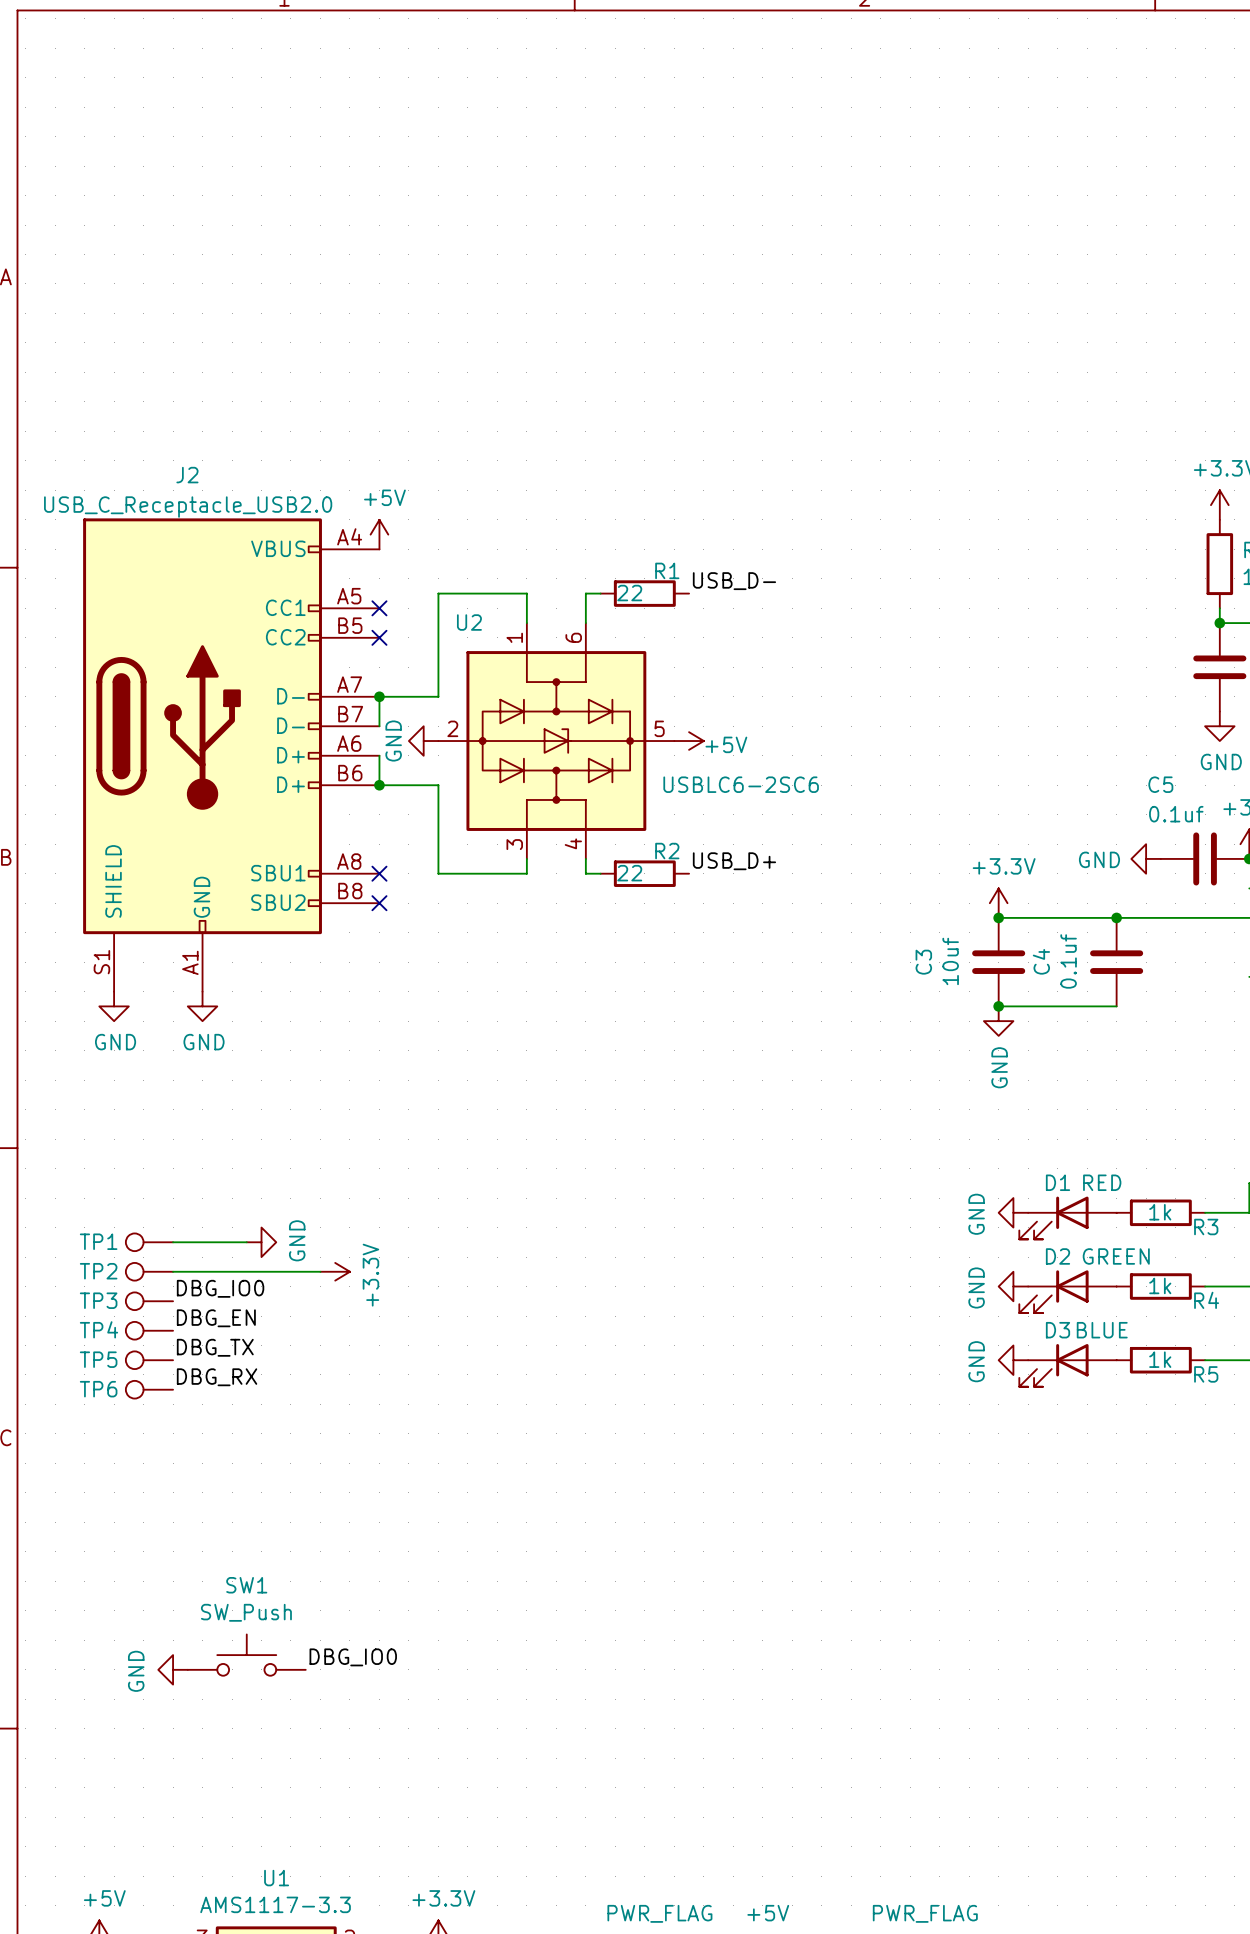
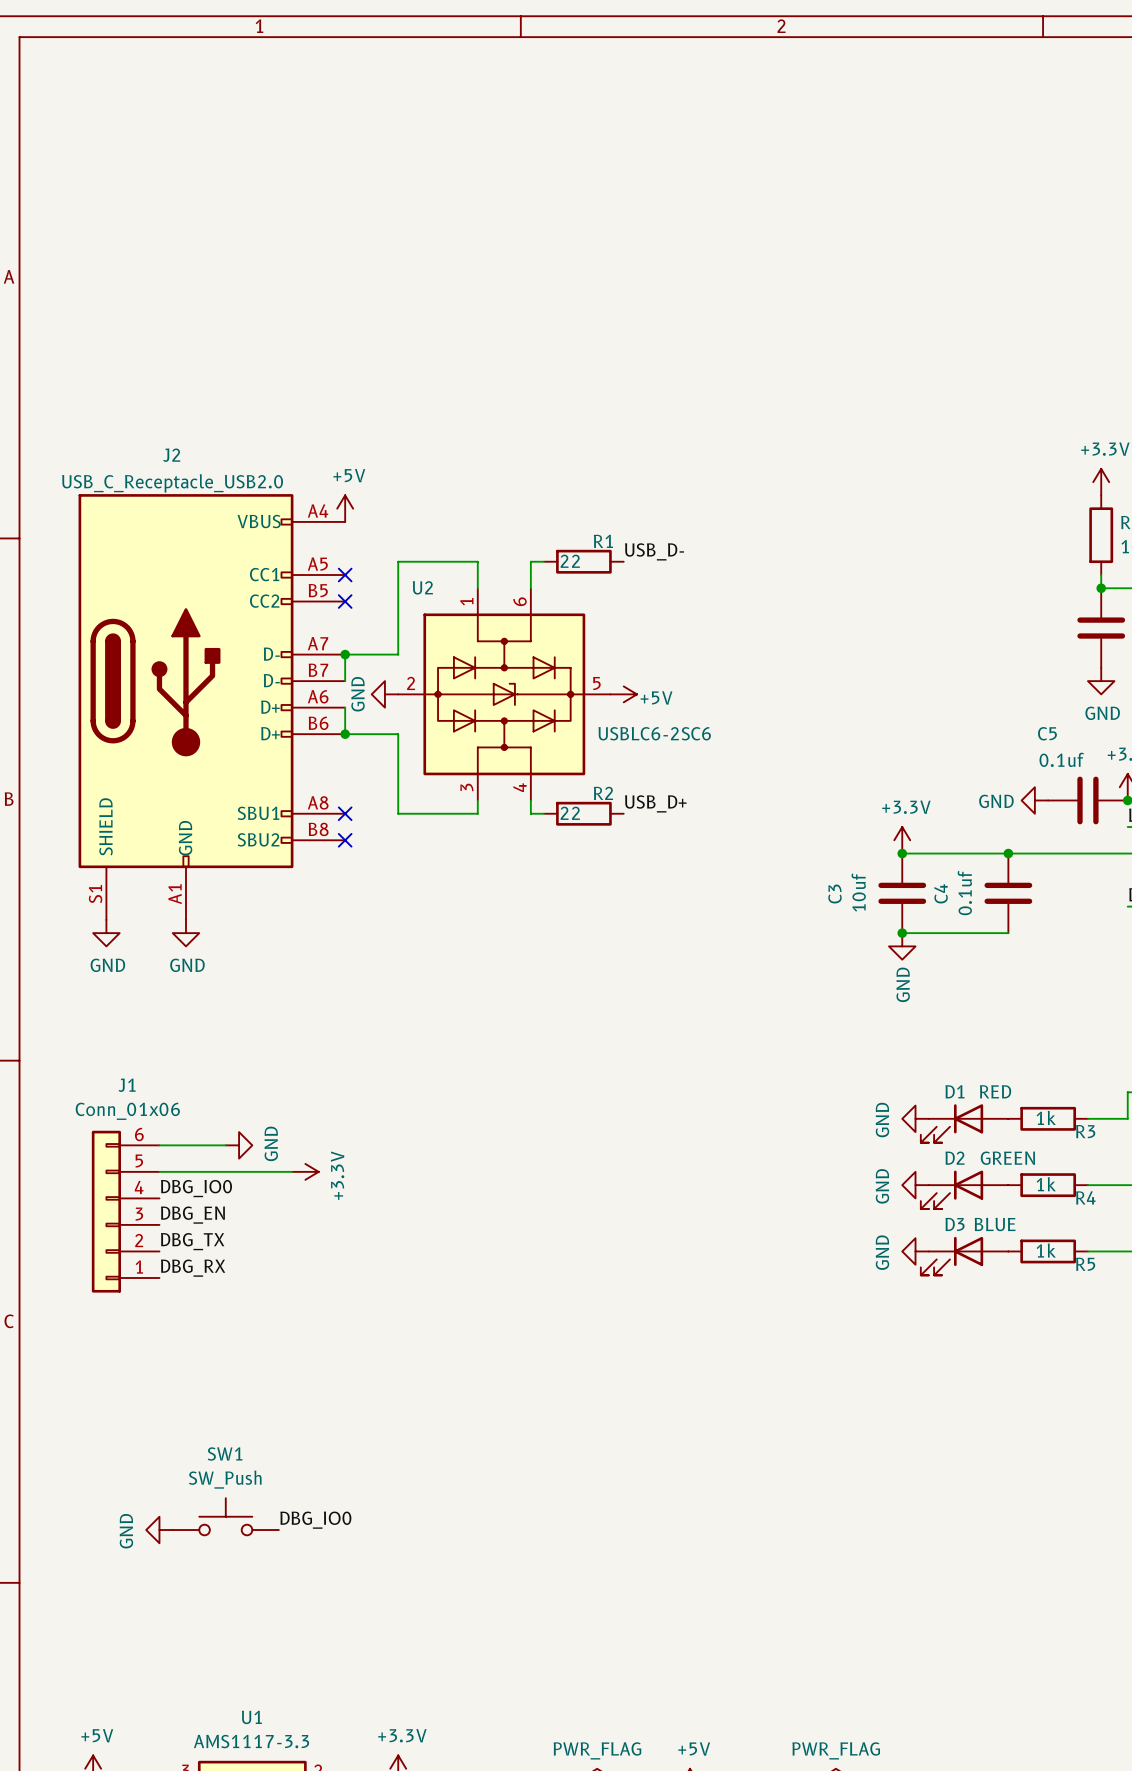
TP1: (149, 1242) -> none
TP2: (149, 1271) -> none
TP3: (149, 1301) -> none
J1: none -> Conn_01x06 (125, 1211)
TP4: (149, 1330) -> none
TP5: (149, 1360) -> none
TP6: (149, 1389) -> none

